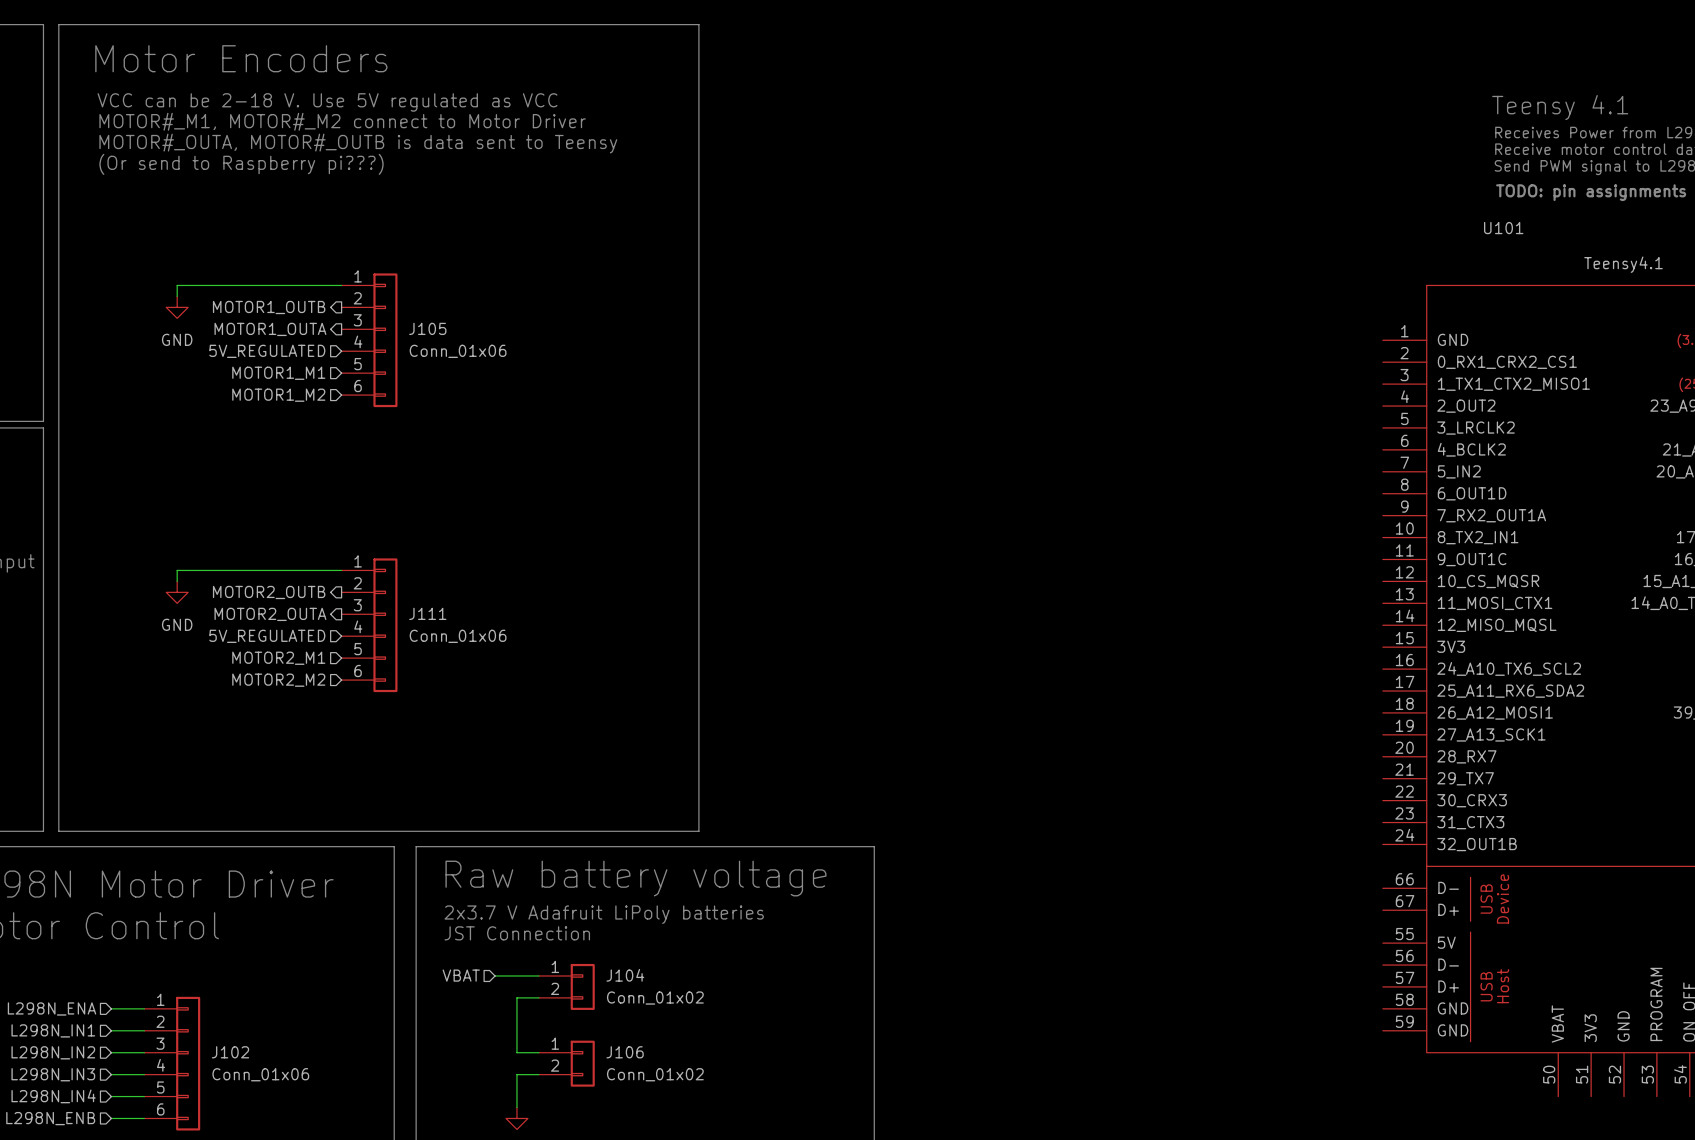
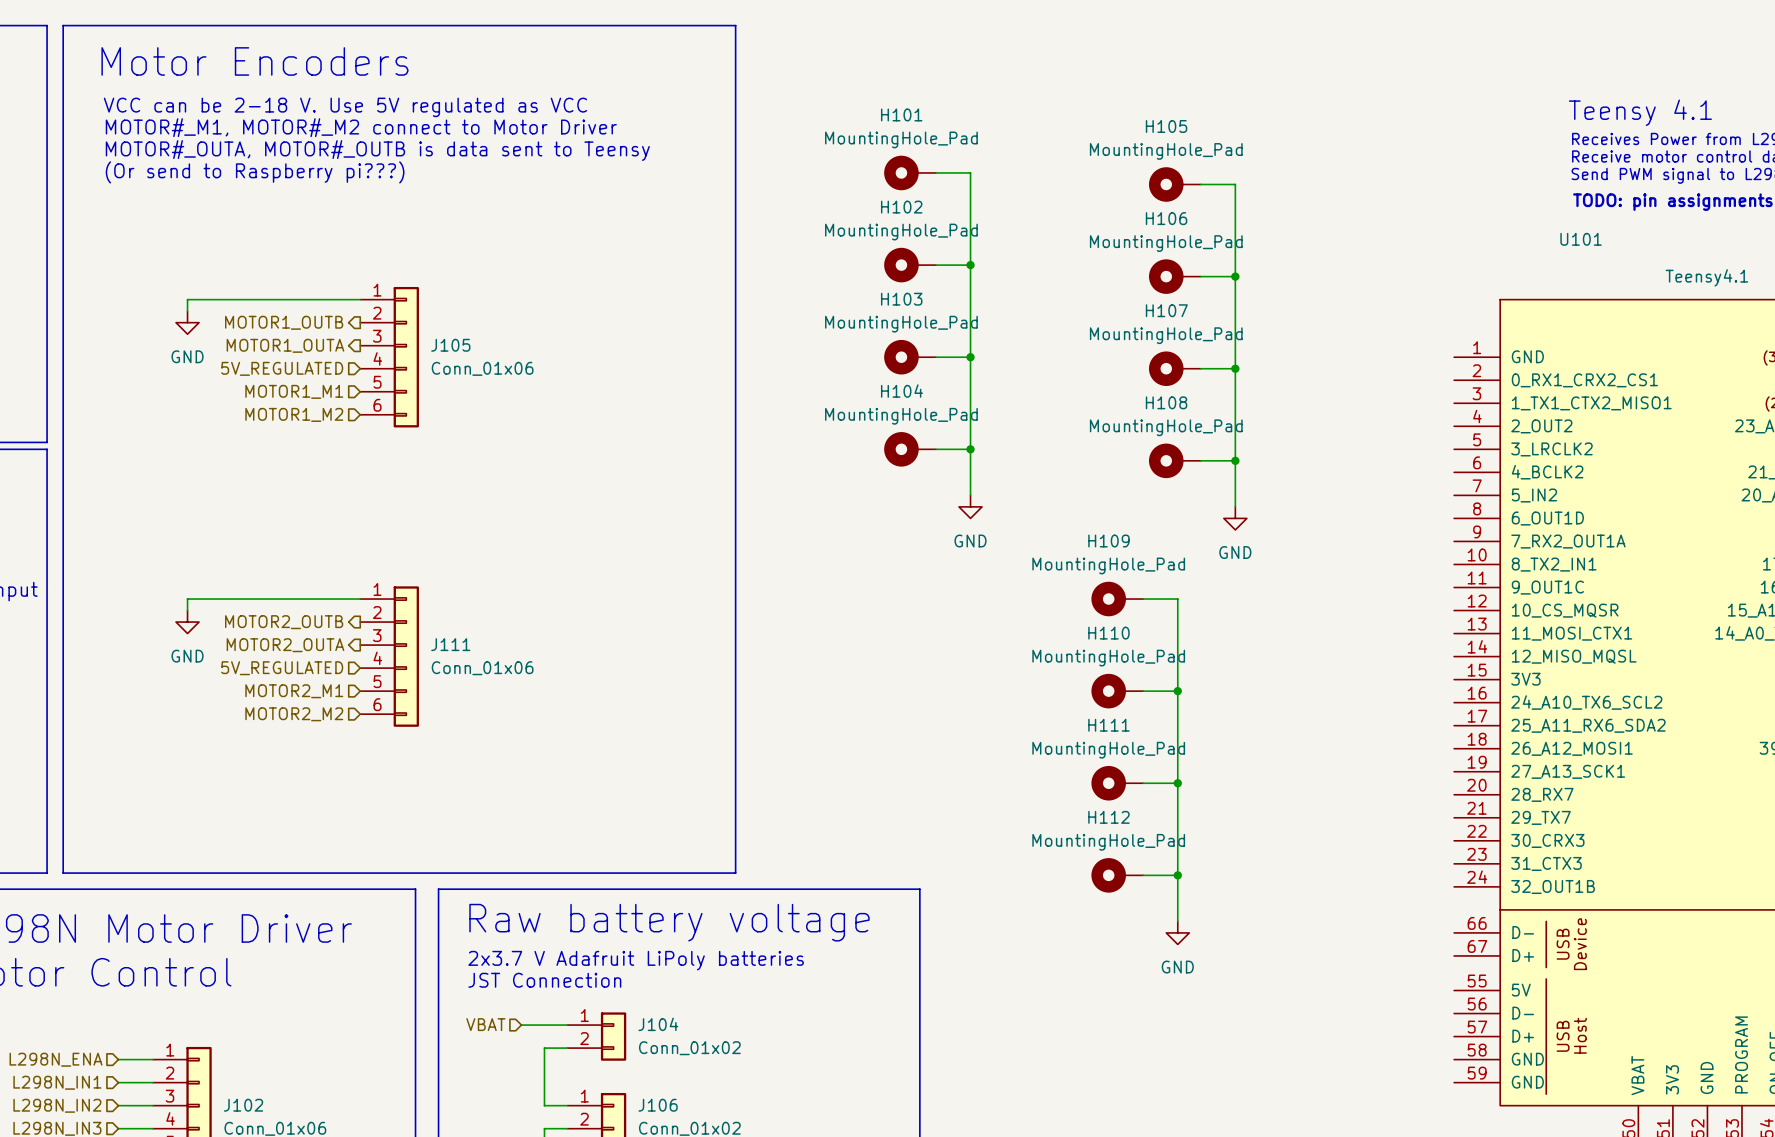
H101: none -> MountingHole_Pad (910, 172)
wire: none -> (935, 172) (970, 172) (970, 495)
H105: none -> MountingHole_Pad (1174, 184)
wire: none -> (1200, 184) (1235, 184) (1235, 506)
H102: none -> MountingHole_Pad (910, 265)
wire: none -> (935, 265) (970, 265)
junction: none -> (970, 265)
H106: none -> MountingHole_Pad (1174, 276)
wire: none -> (1200, 276) (1235, 276)
junction: none -> (1235, 276)
H103: none -> MountingHole_Pad (910, 357)
wire: none -> (935, 357) (970, 357)
junction: none -> (970, 357)
H107: none -> MountingHole_Pad (1174, 368)
wire: none -> (1200, 368) (1235, 368)
junction: none -> (1235, 368)
H104: none -> MountingHole_Pad (910, 449)
wire: none -> (935, 449) (970, 449)
junction: none -> (970, 449)
H108: none -> MountingHole_Pad (1174, 460)
wire: none -> (1200, 460) (1235, 460)
junction: none -> (1235, 460)
power symbol: none -> GND (970, 506)
power symbol: none -> GND (1235, 518)
H109: none -> MountingHole_Pad (1117, 599)
wire: none -> (1143, 599) (1177, 599) (1177, 921)
H110: none -> MountingHole_Pad (1117, 691)
wire: none -> (1143, 691) (1177, 691)
junction: none -> (1177, 691)
H111: none -> MountingHole_Pad (1117, 783)
wire: none -> (1143, 783) (1177, 783)
junction: none -> (1177, 783)
H112: none -> MountingHole_Pad (1117, 875)
wire: none -> (1143, 875) (1177, 875)
junction: none -> (1177, 875)
power symbol: none -> GND (1177, 932)

